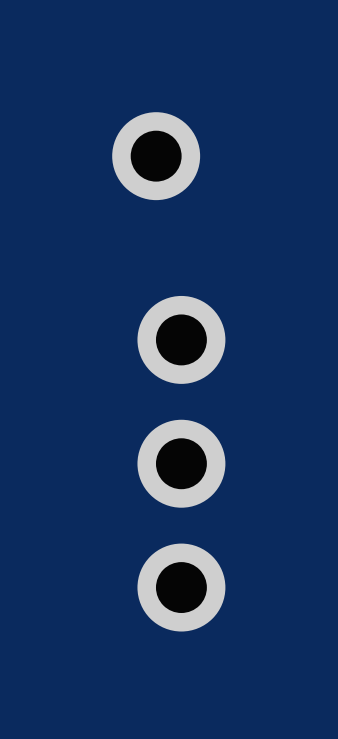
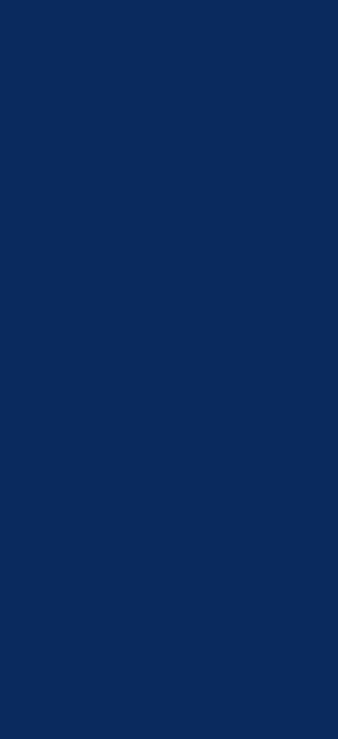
part: (156, 156) -> none
part: (181, 339) -> none
part: (181, 463) -> none
part: (181, 587) -> none

